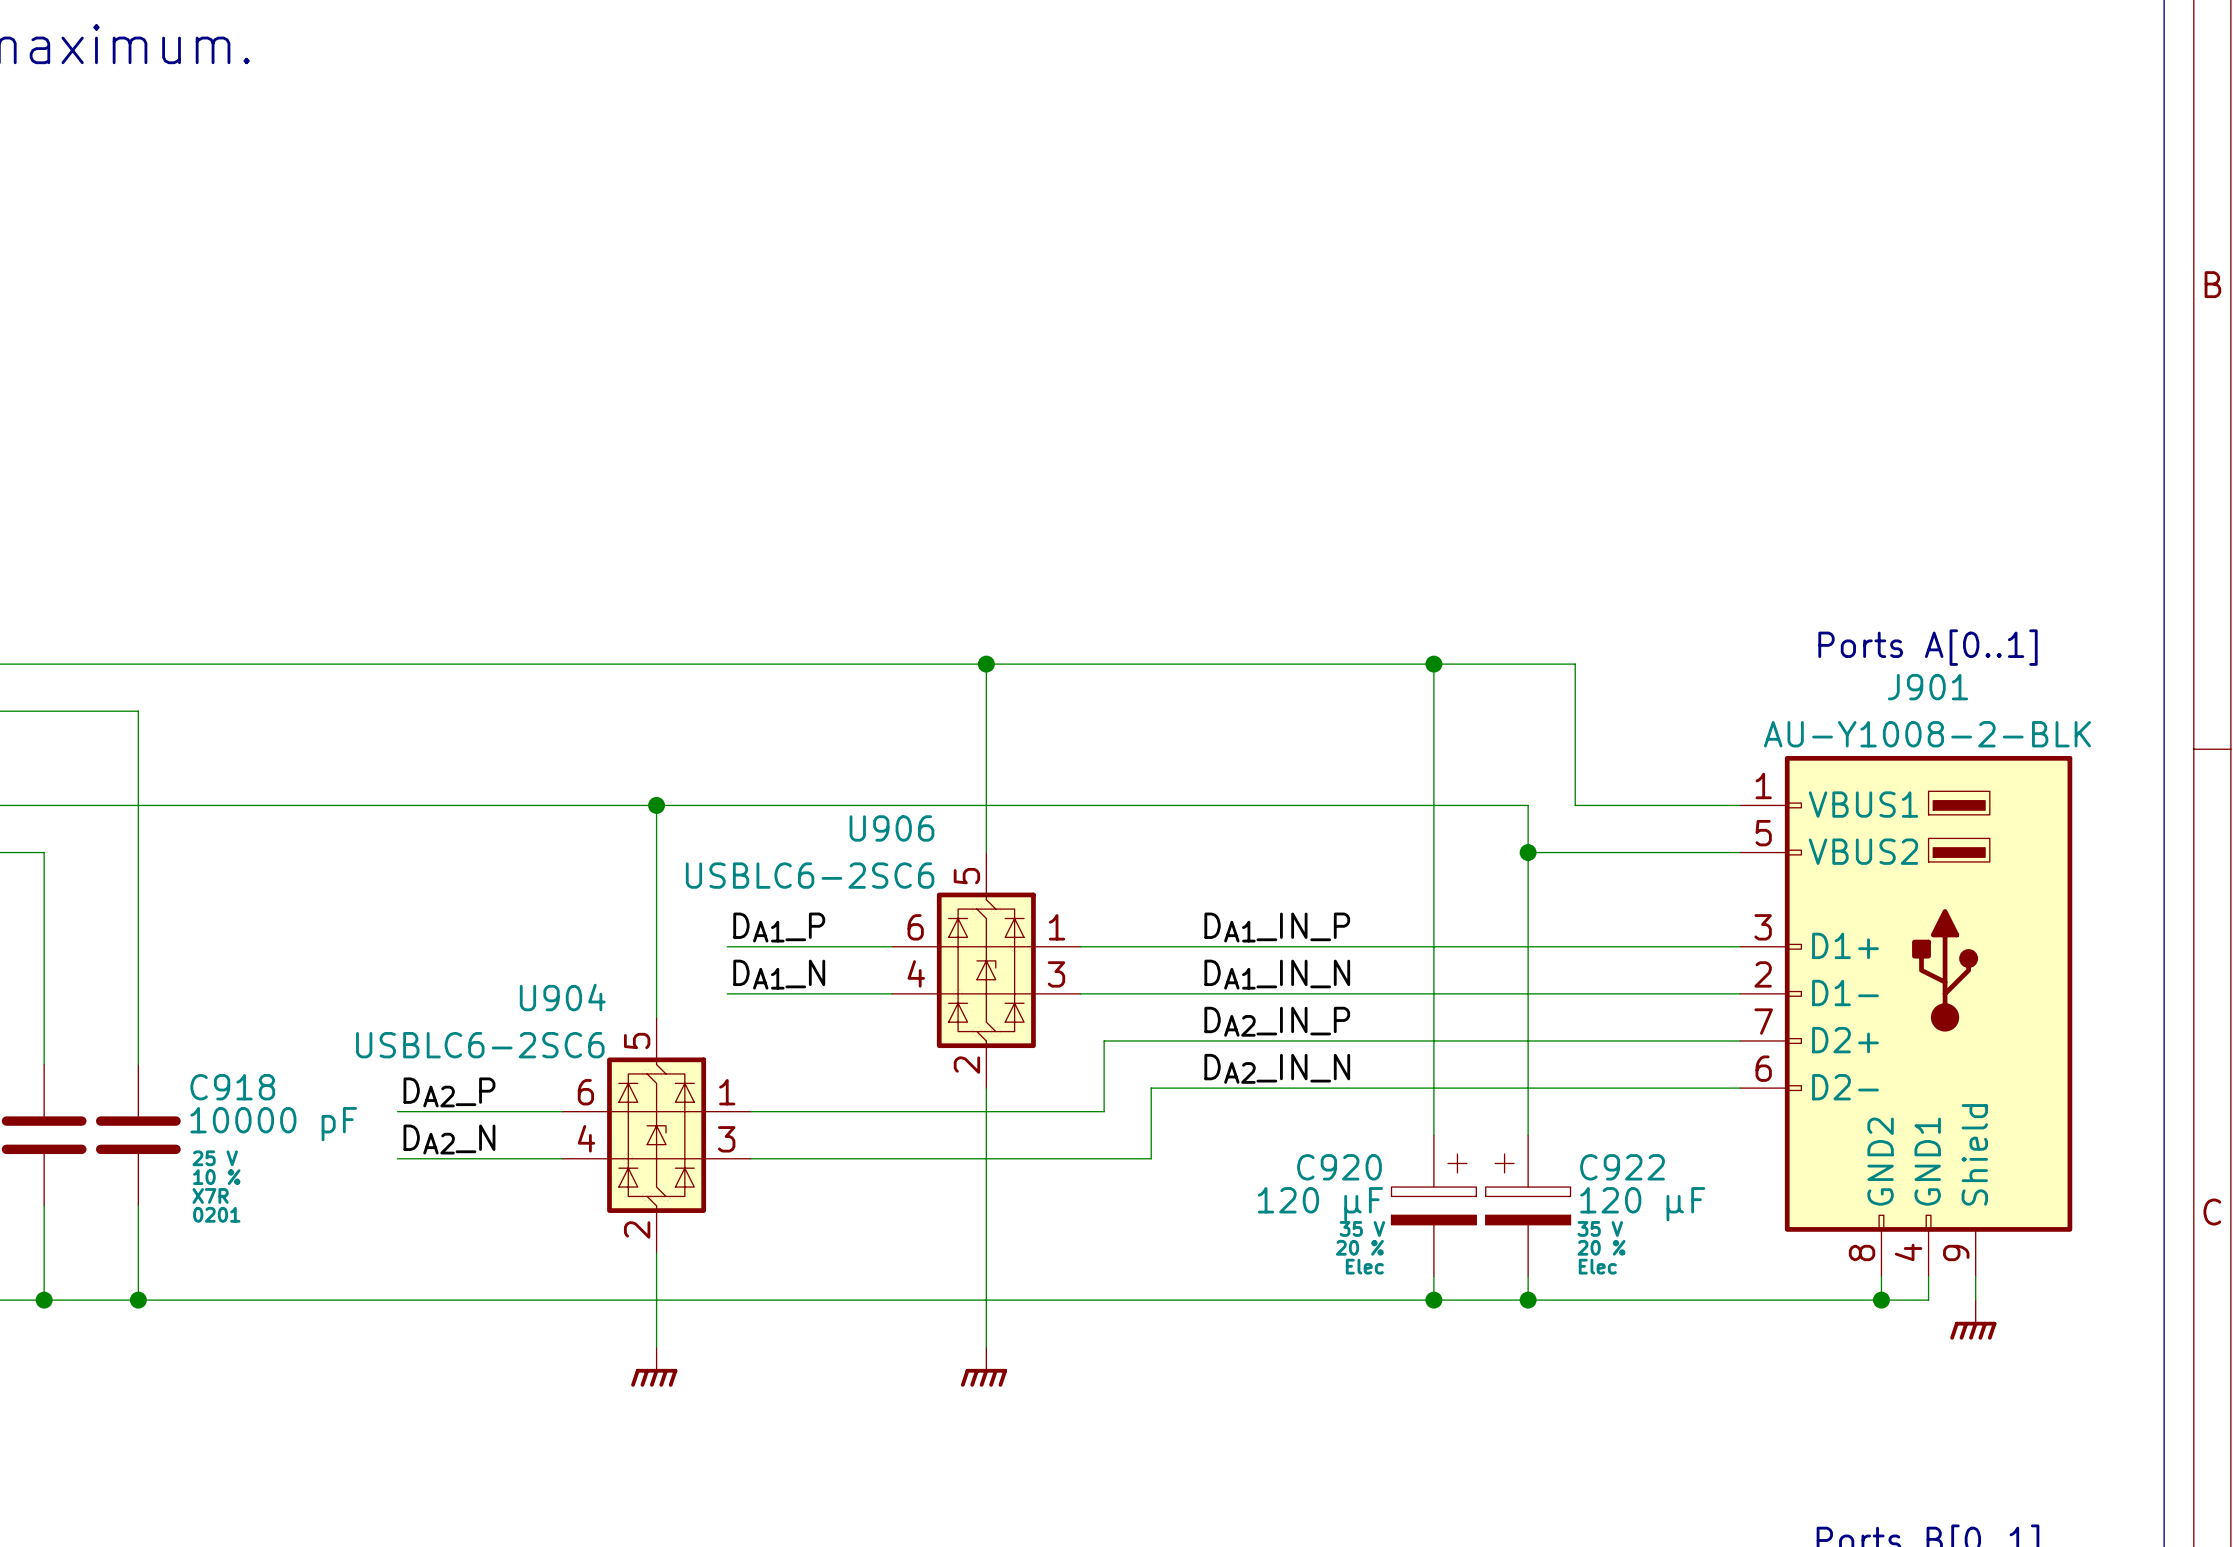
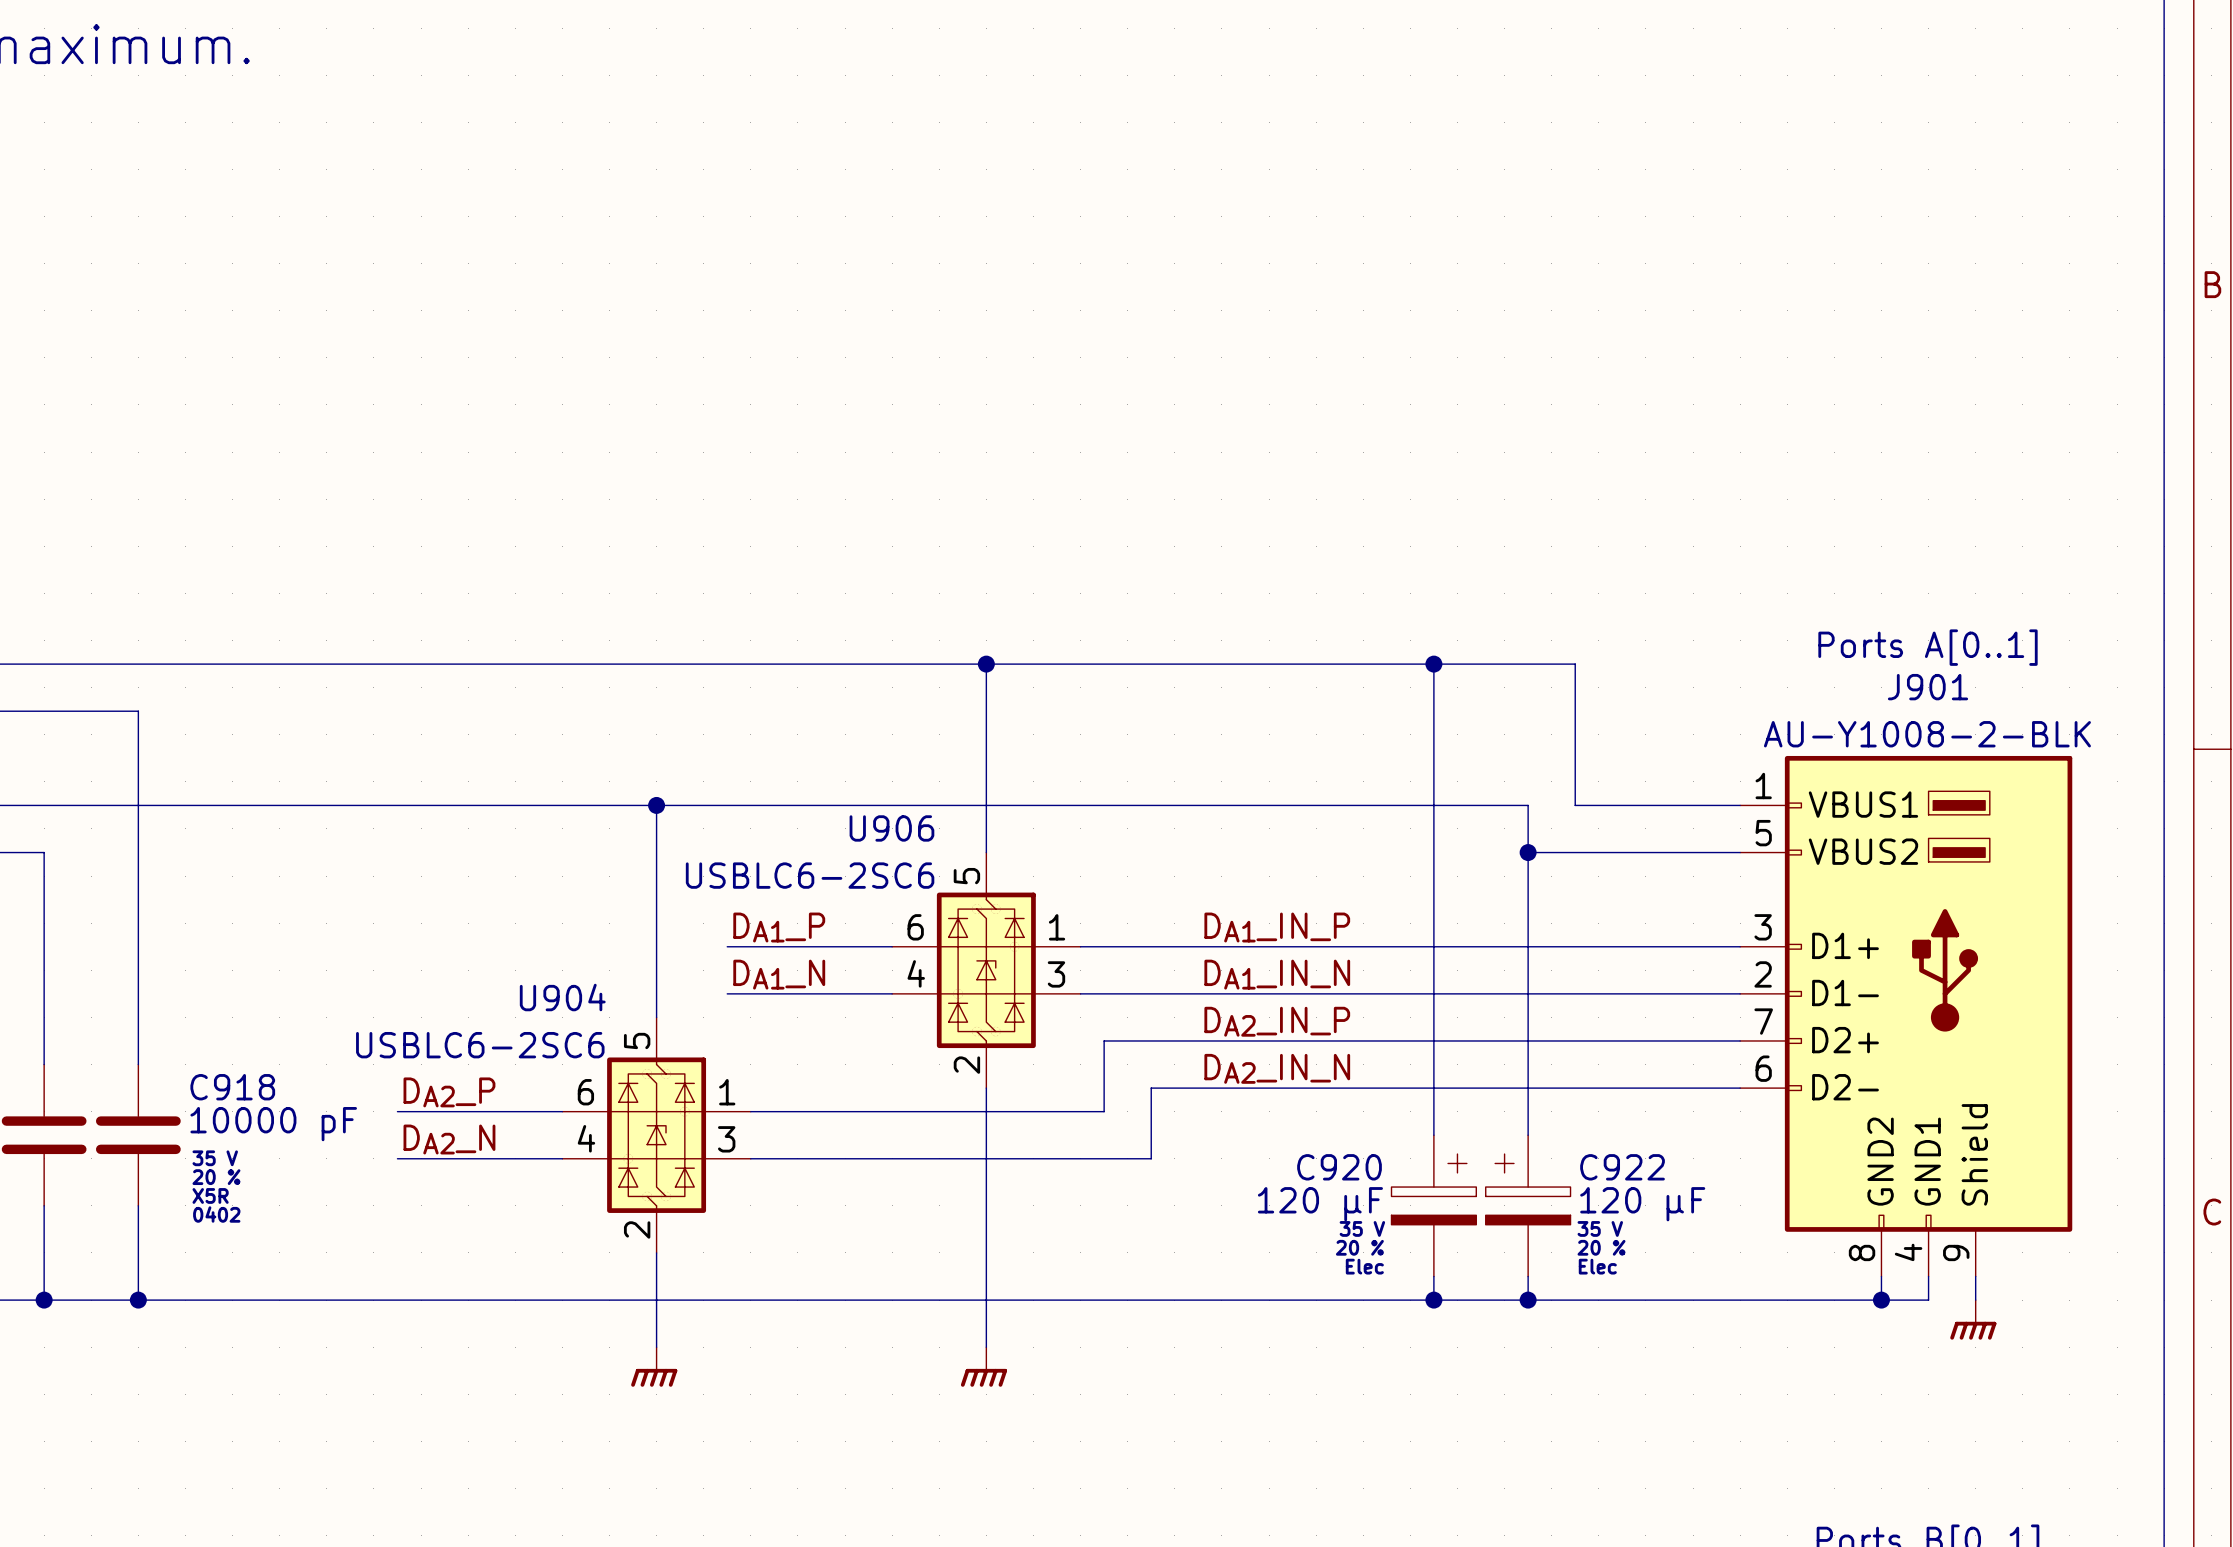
C918 text: 25 V (215, 1158) -> 35 V (215, 1158)
C918 text: 10 % (216, 1177) -> 20 % (216, 1177)
C918 text: X7R (210, 1195) -> X5R (210, 1195)
C918 text: 0201 (216, 1214) -> 0402 (216, 1214)

